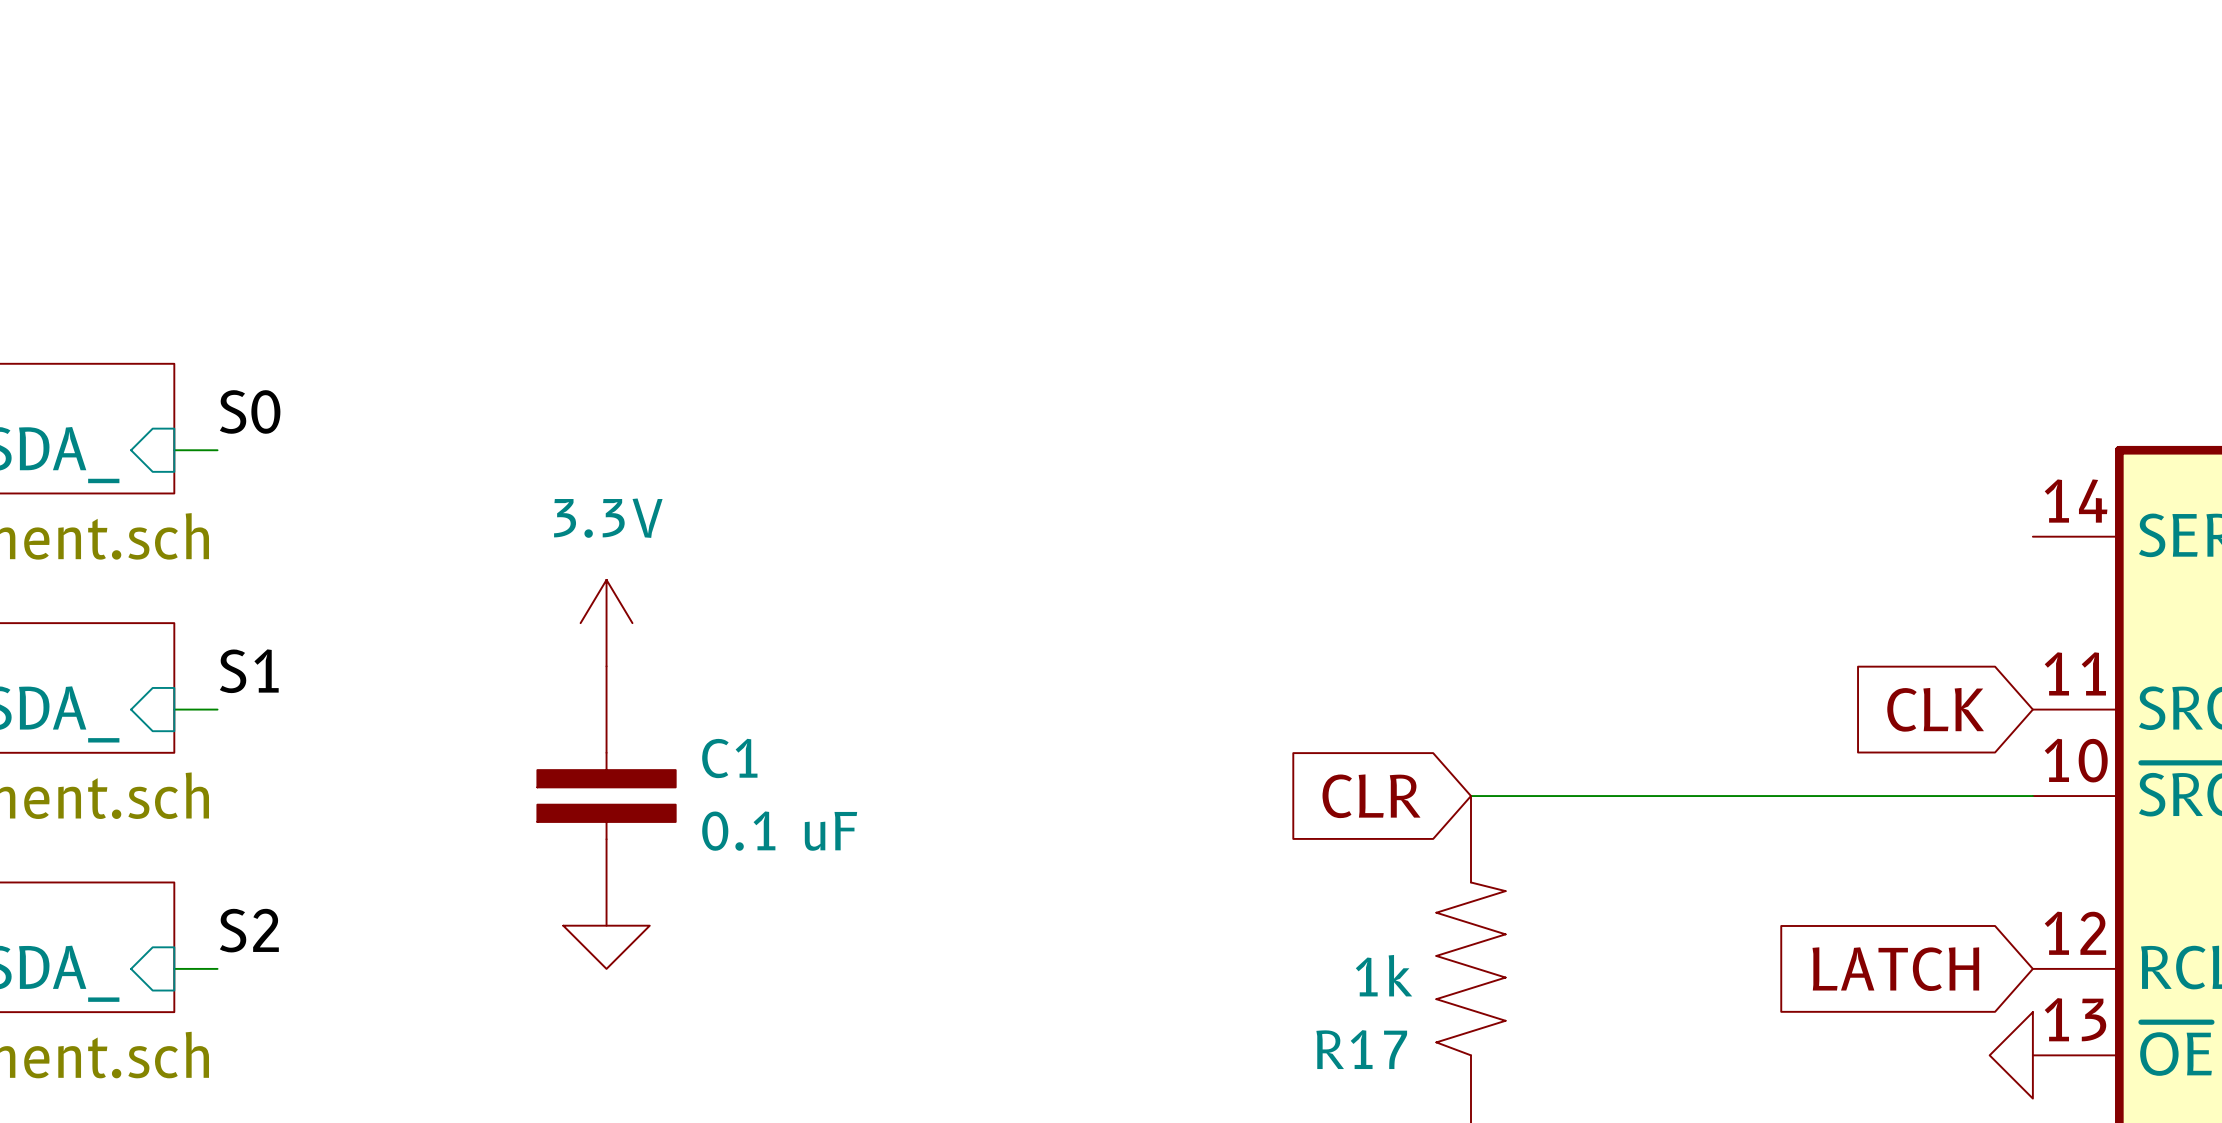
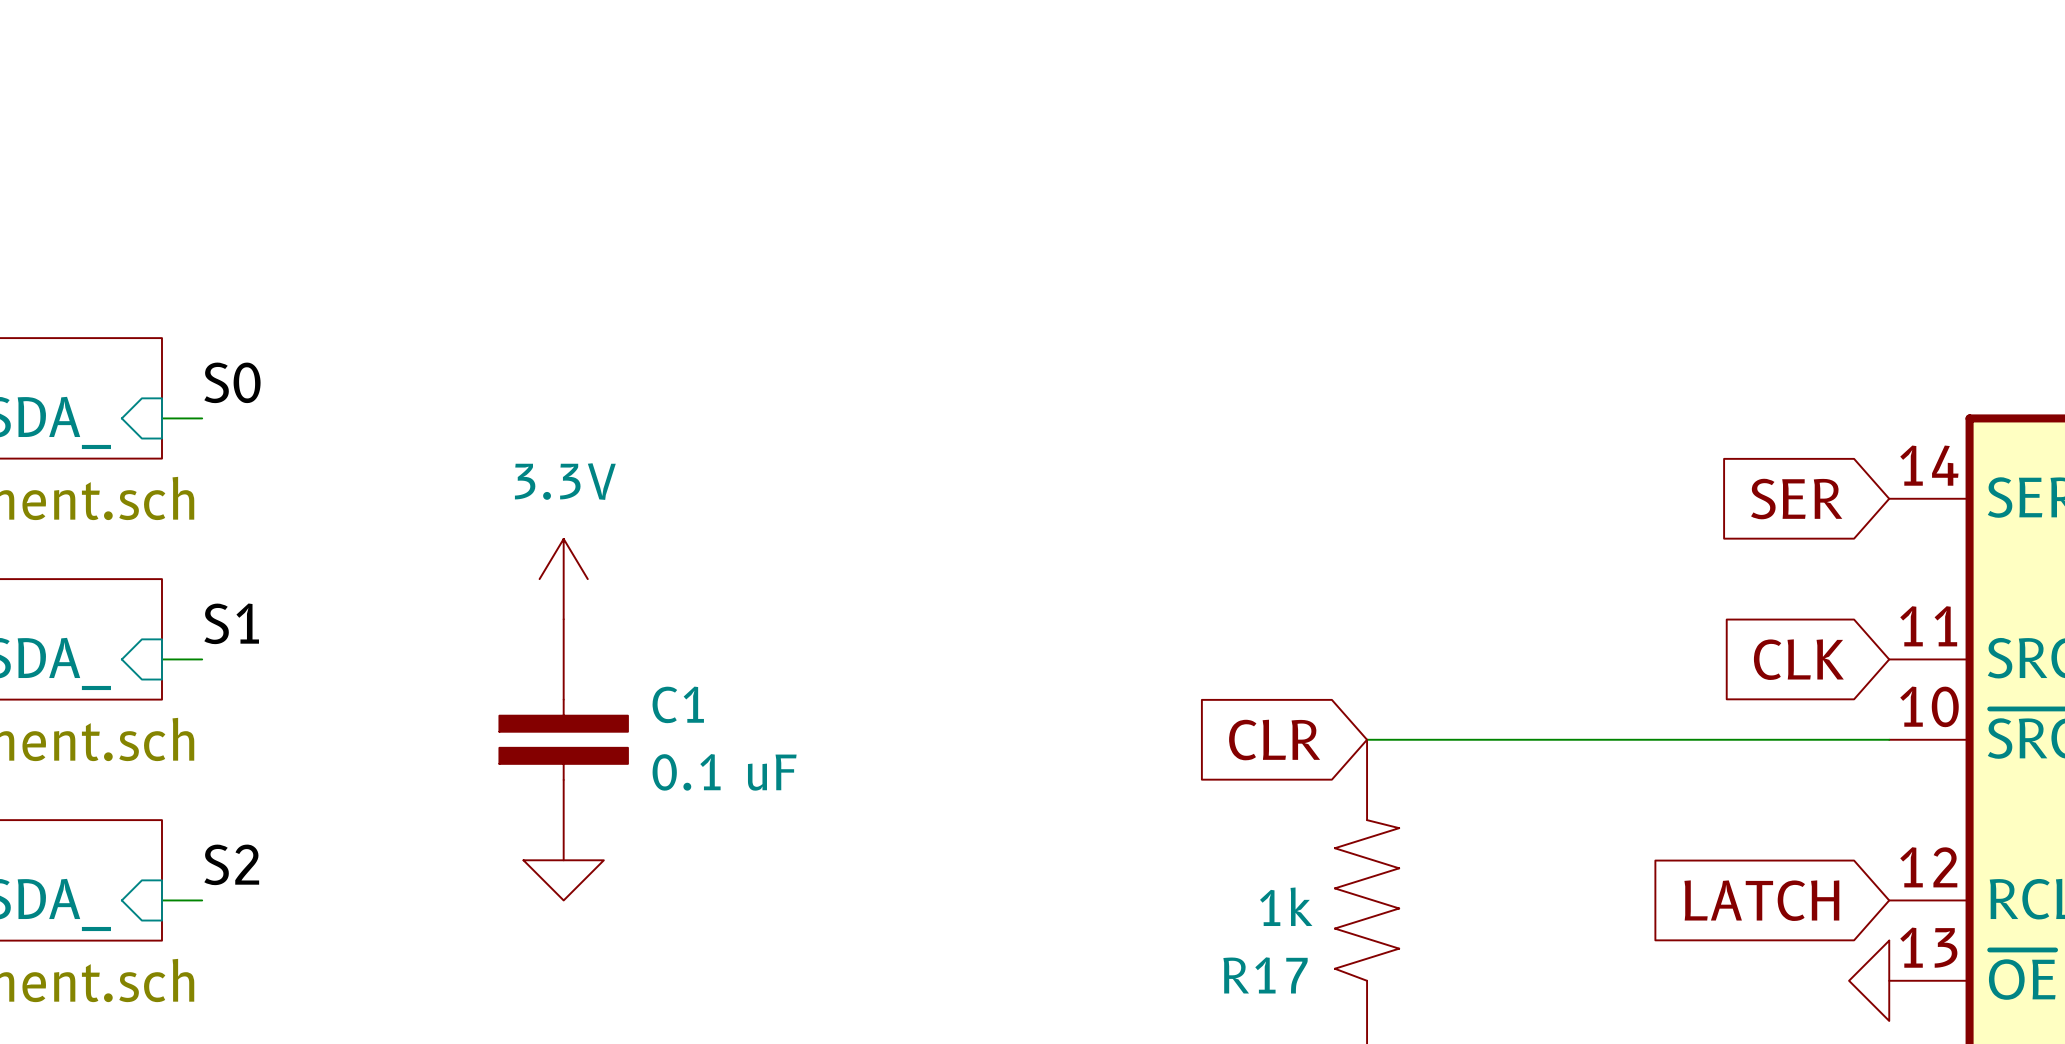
global label: none -> SER (1796, 499)

